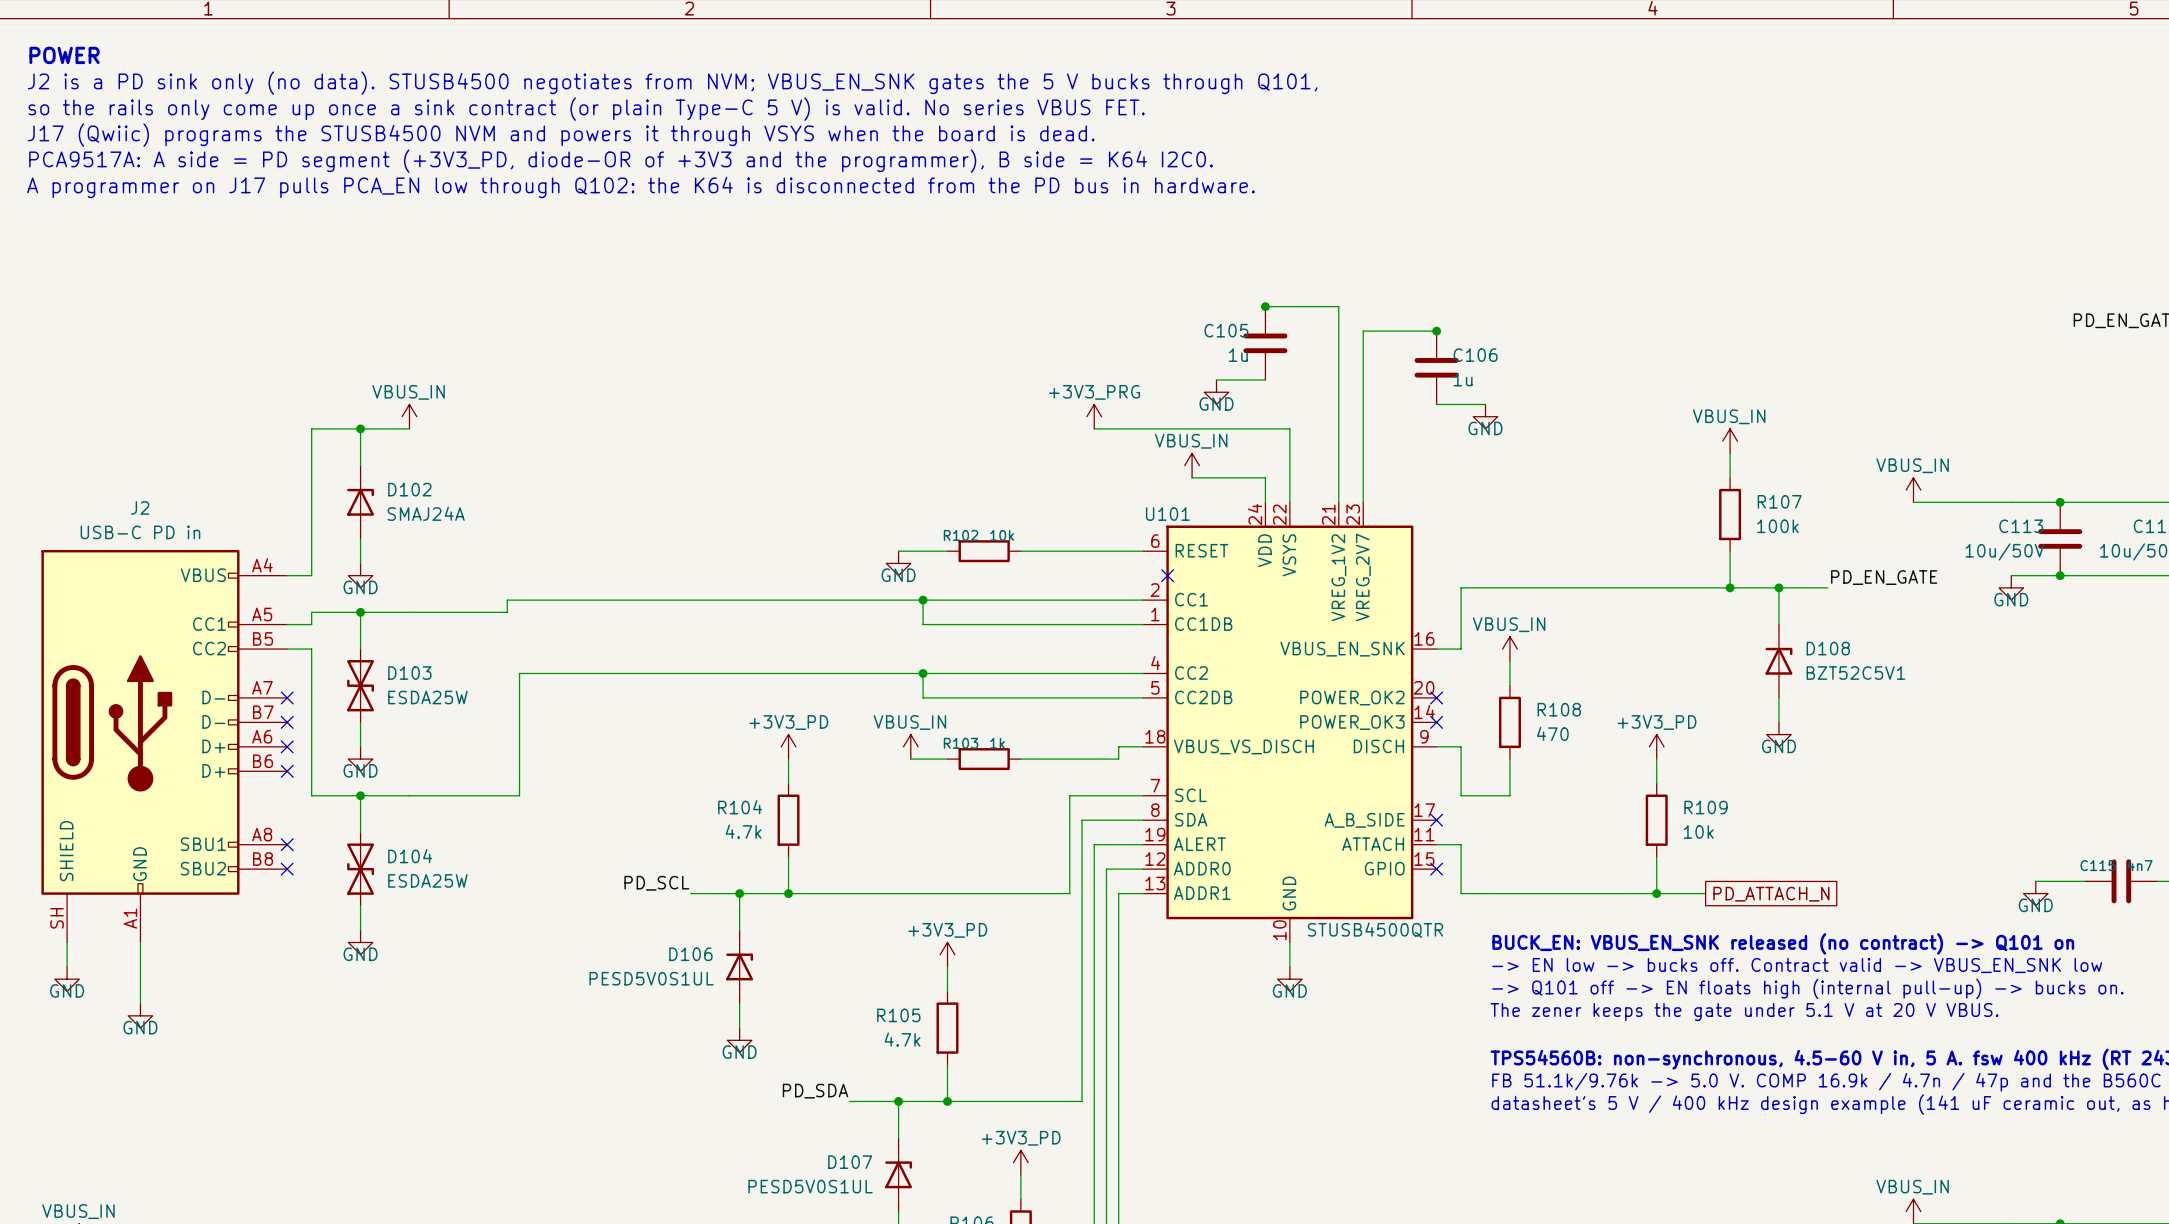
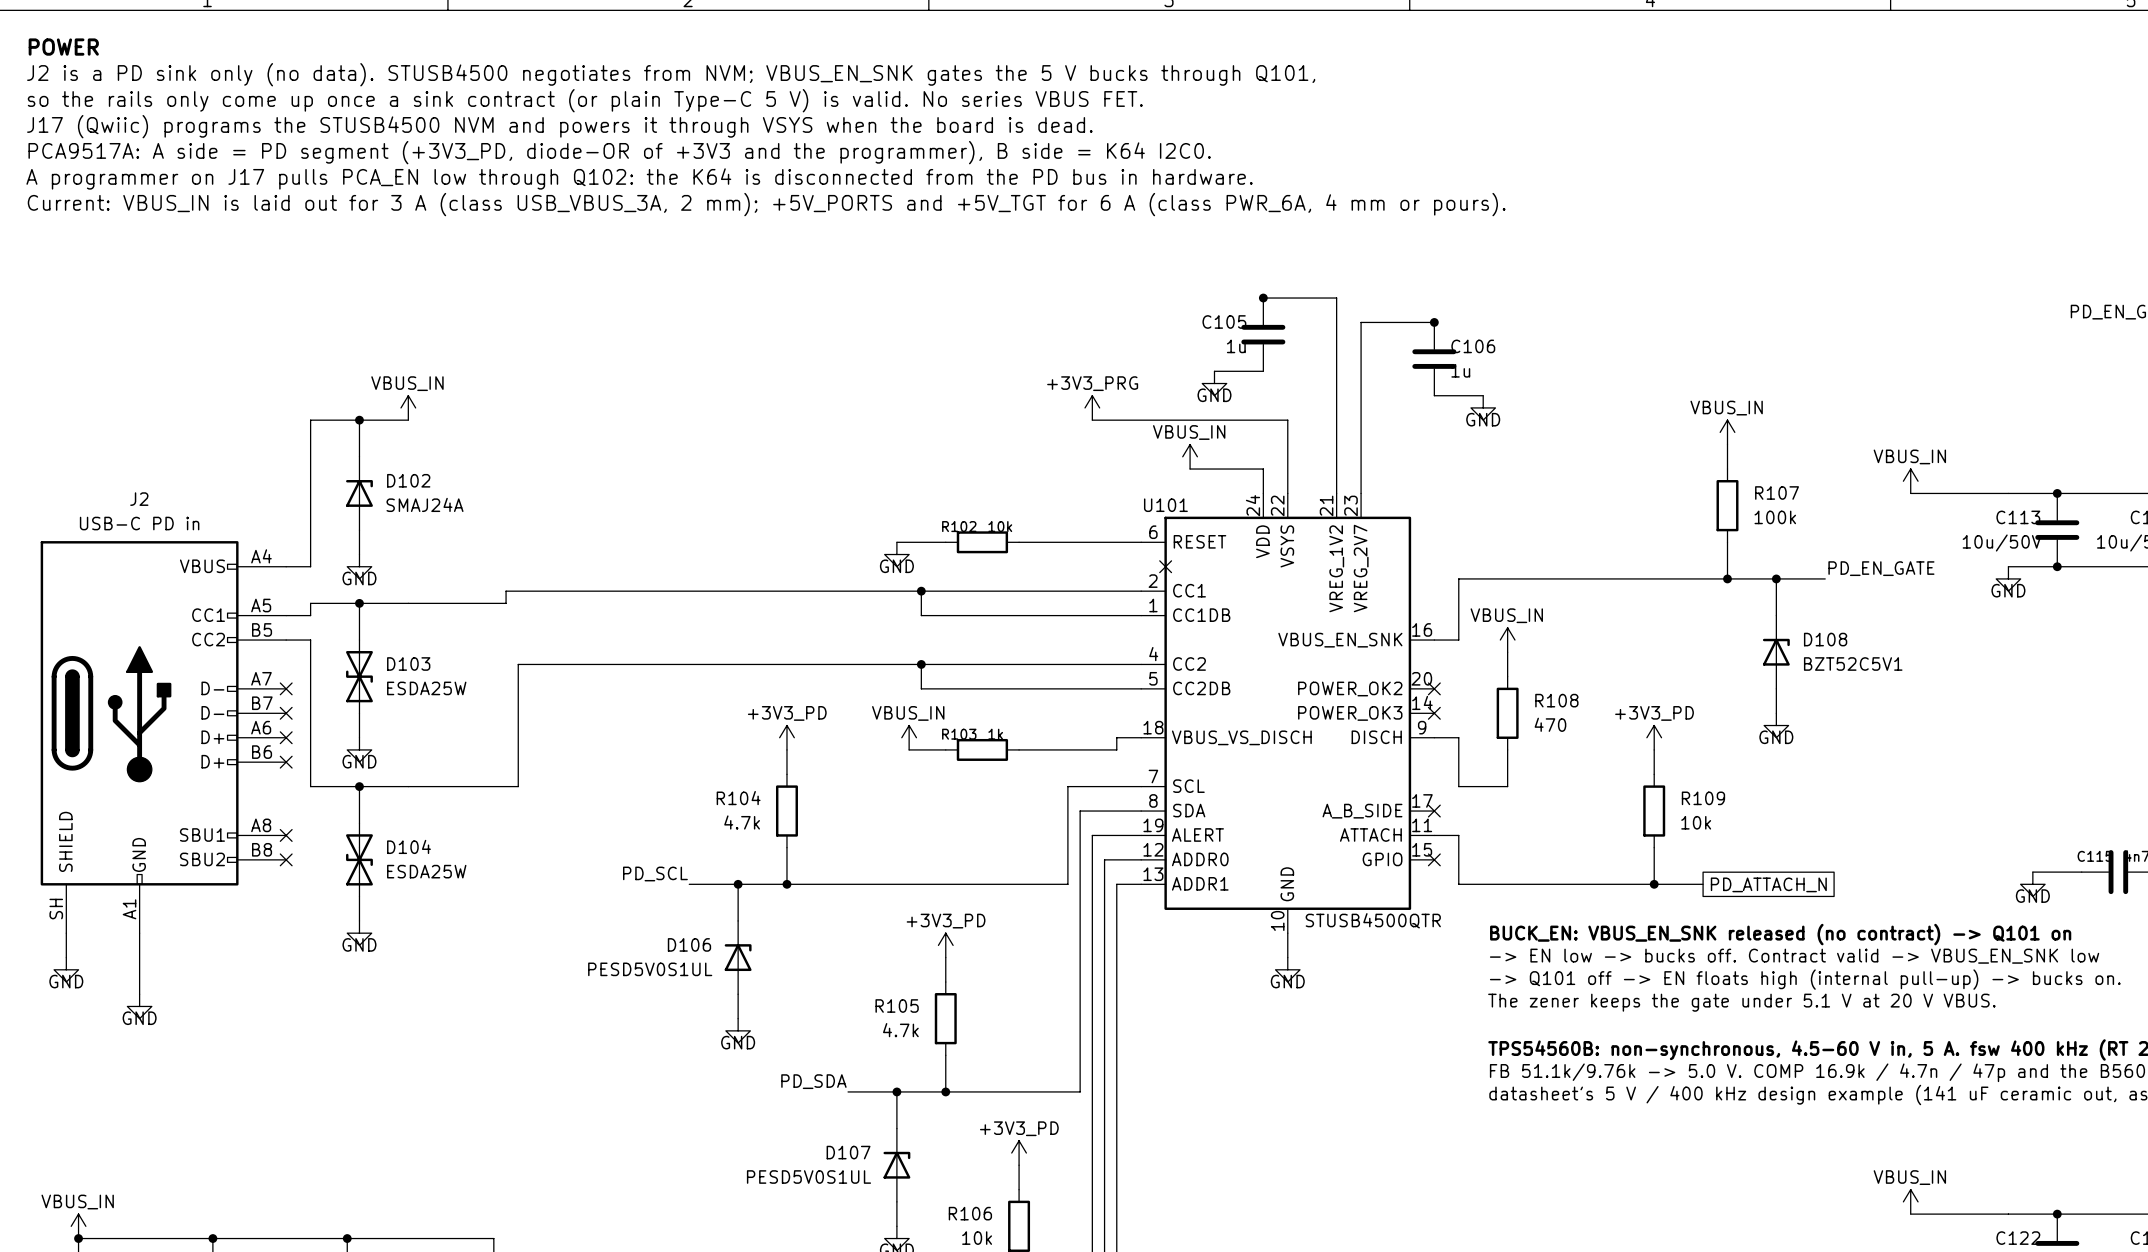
text: none -> Current: VBUS_IN is laid out for 3 A (class USB_VBUS_3A, 2 mm); +5V_PORTS and +5V_TGT for 6 A (class PWR_6A, 4 mm or pours). (766, 204)

